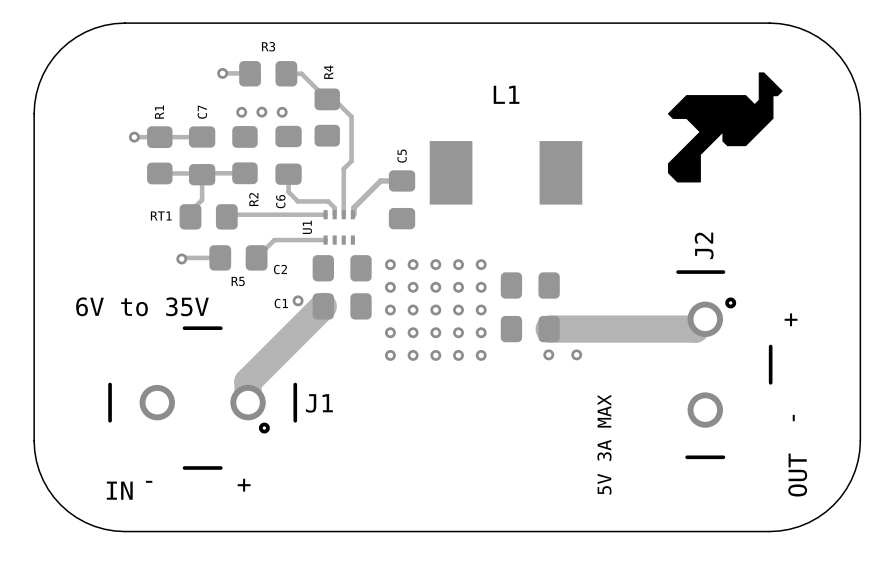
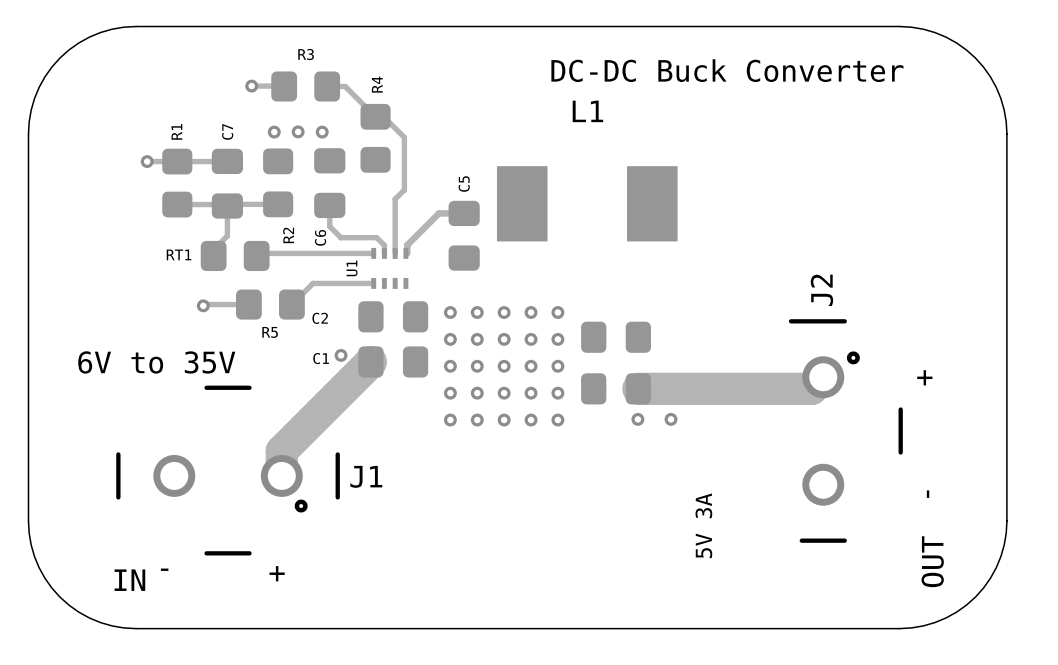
text: none -> DC-DC Buck Converter (727, 70)
drawing: [667, 72, 783, 183] -> none
J2 value: 5V 3A MAX (604, 444) -> 5V 3A (703, 525)

